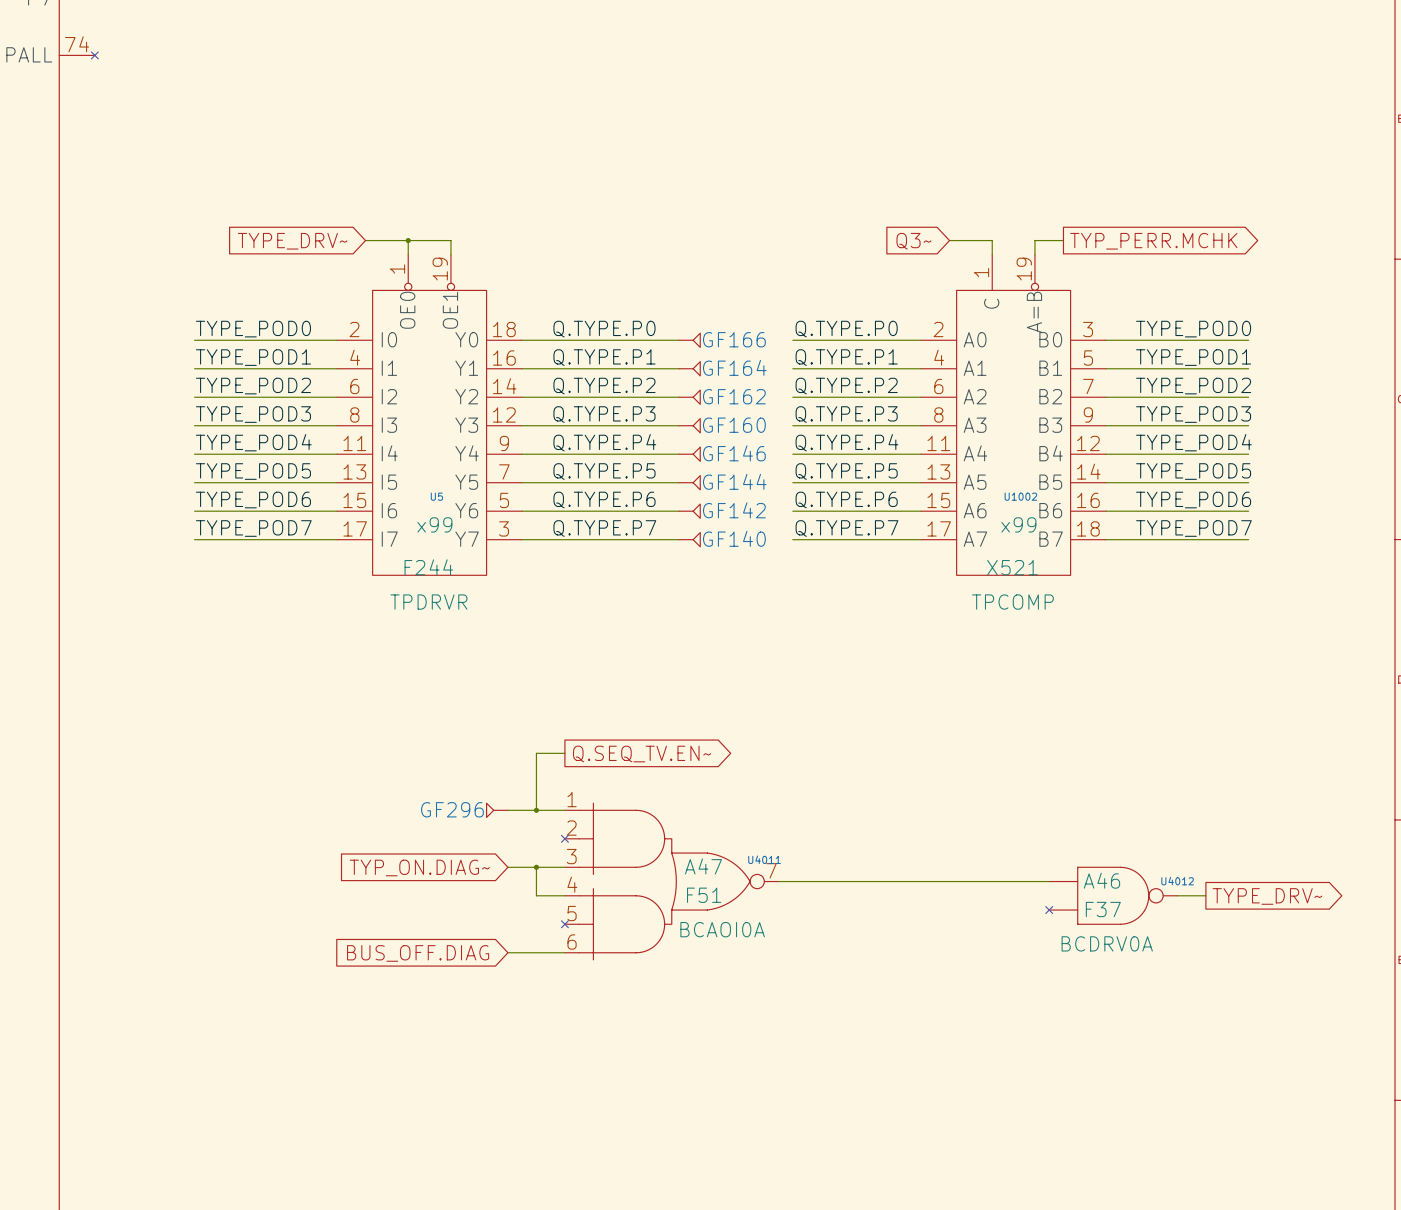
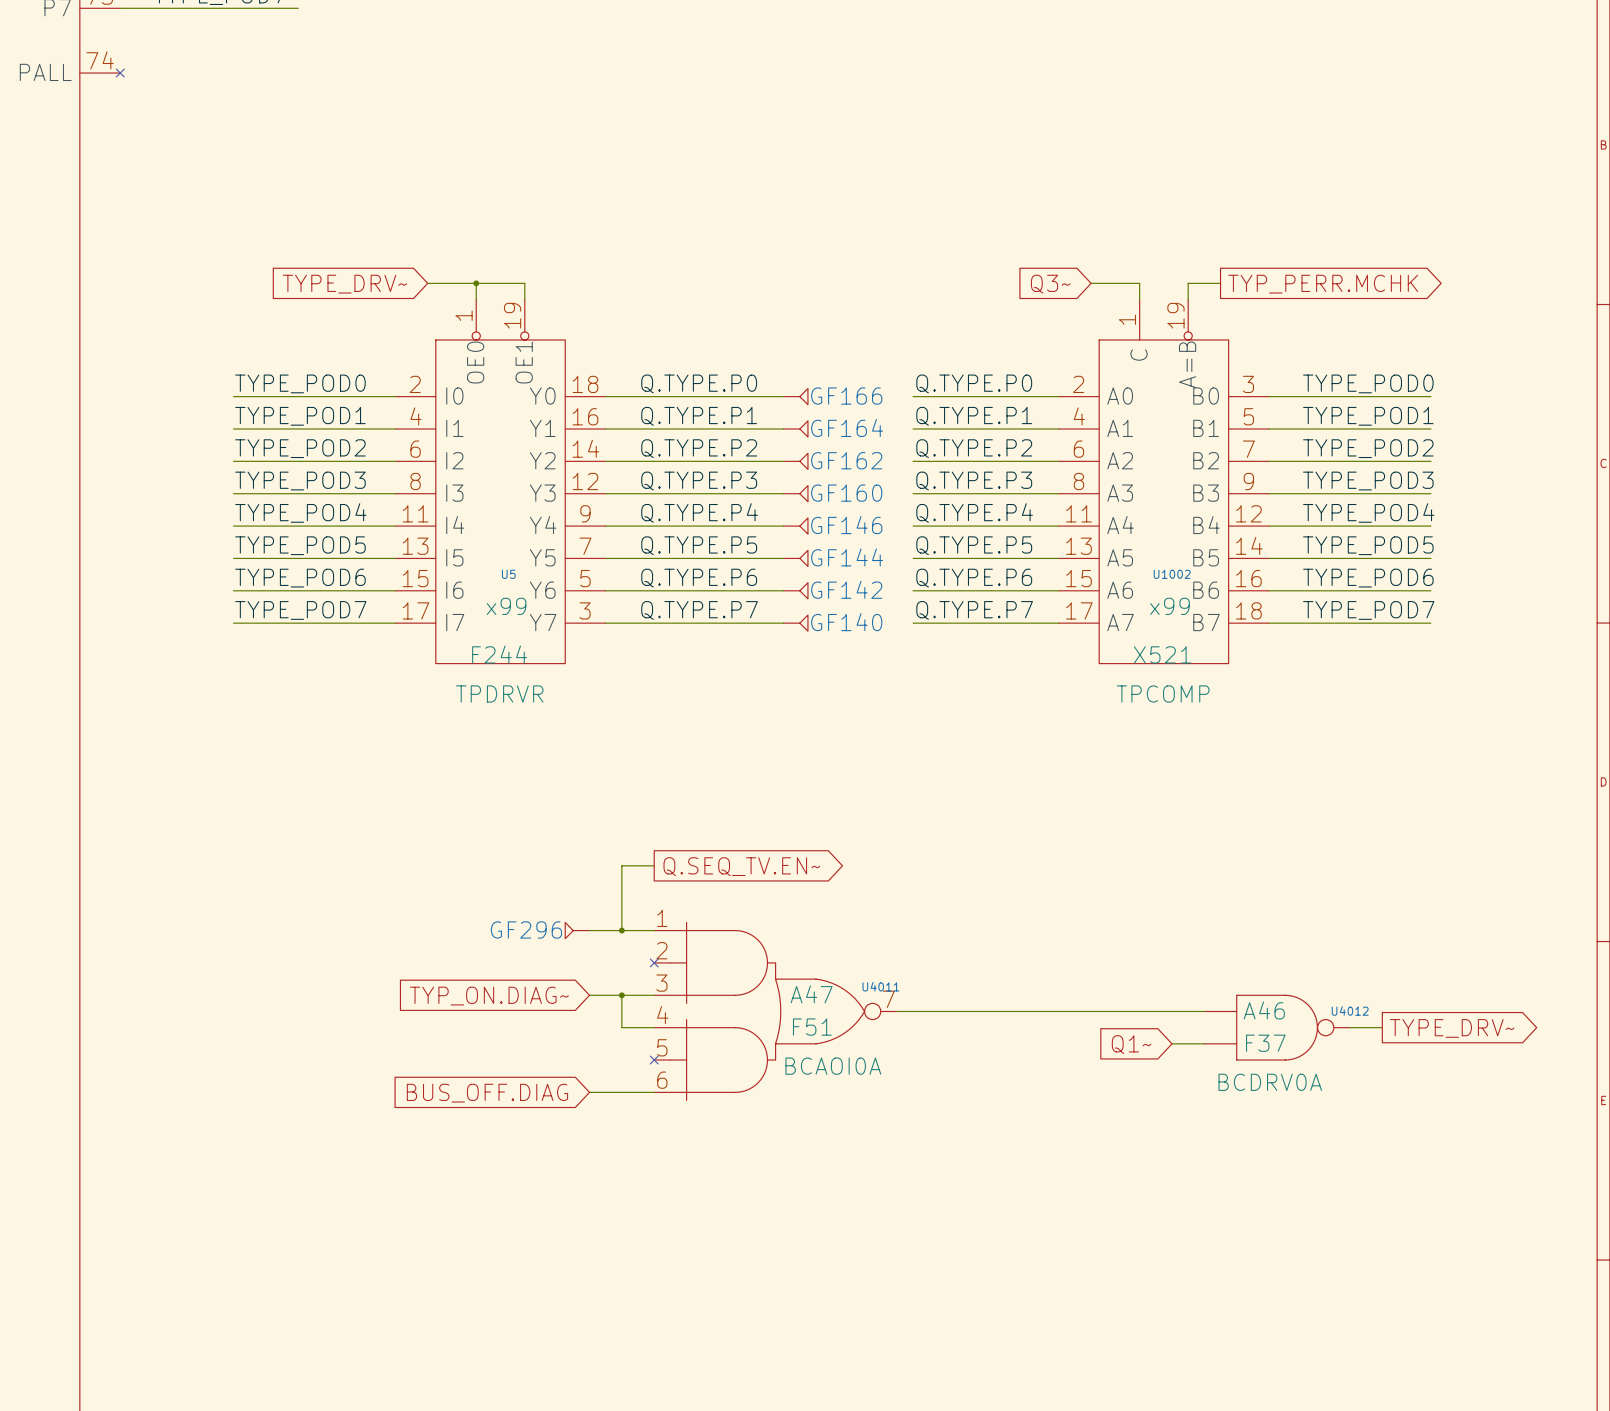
global label: none -> Q1~ (1131, 1044)
wire: none -> (1172, 1043) (1204, 1043)
no-connect mark: (1049, 910) -> none

